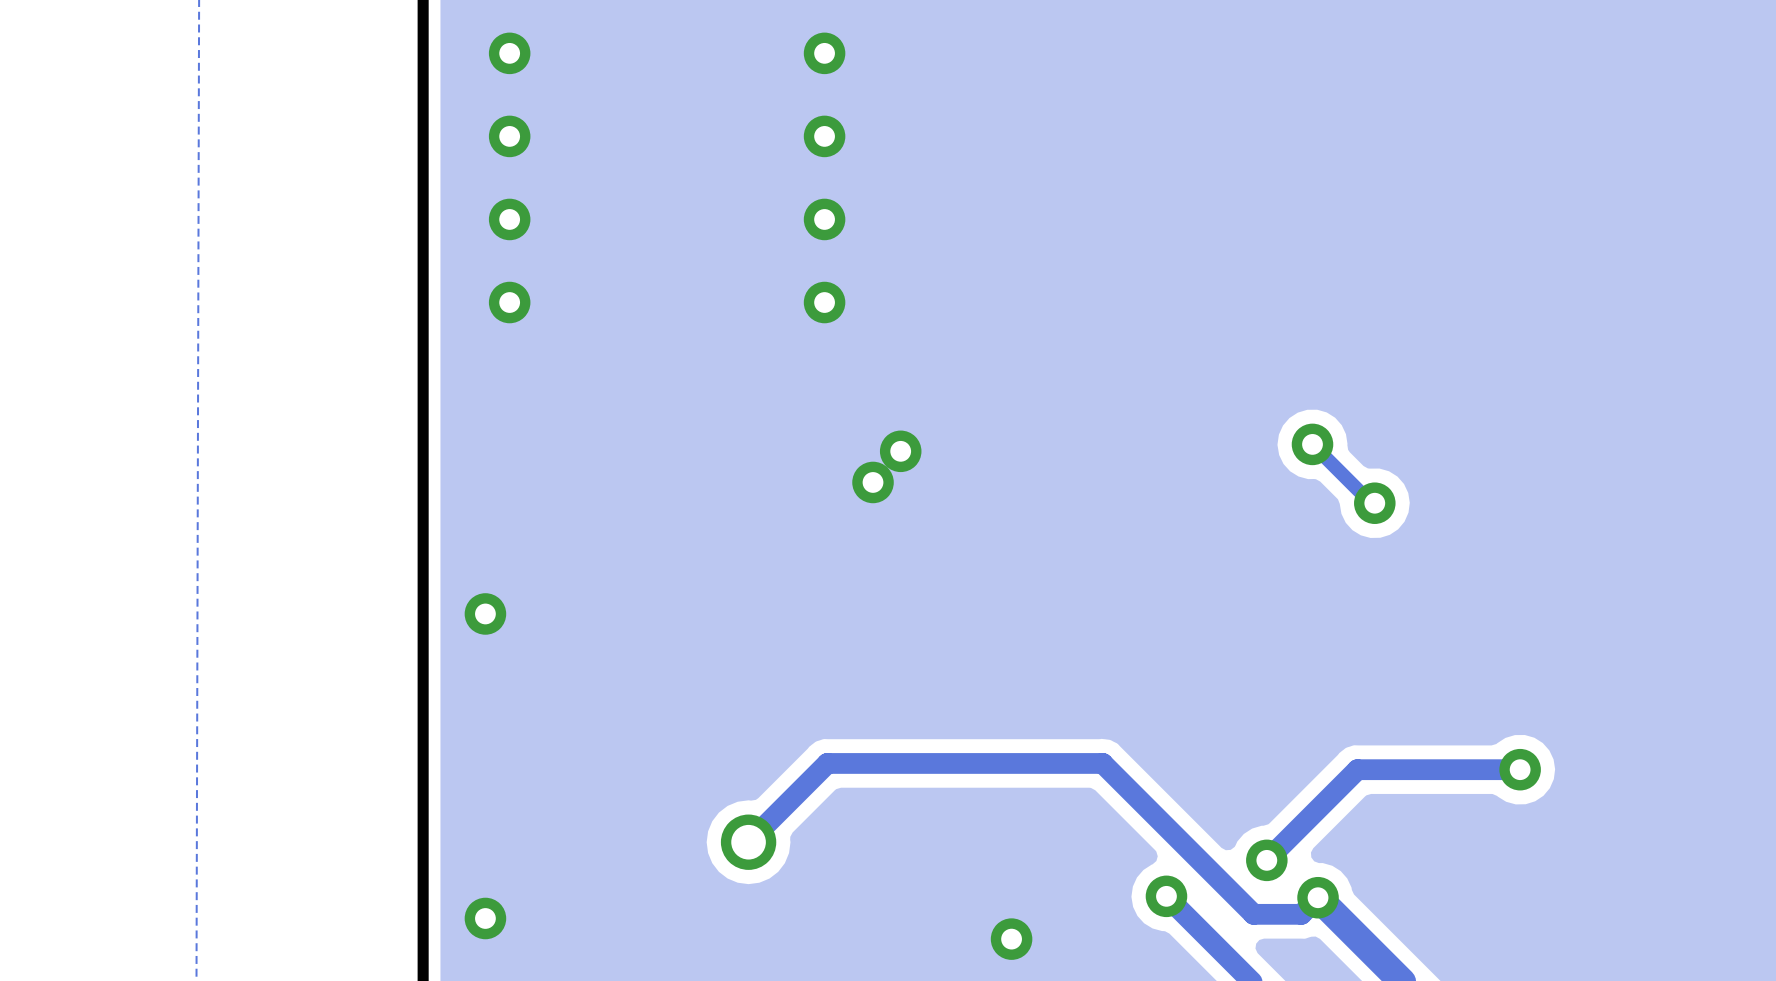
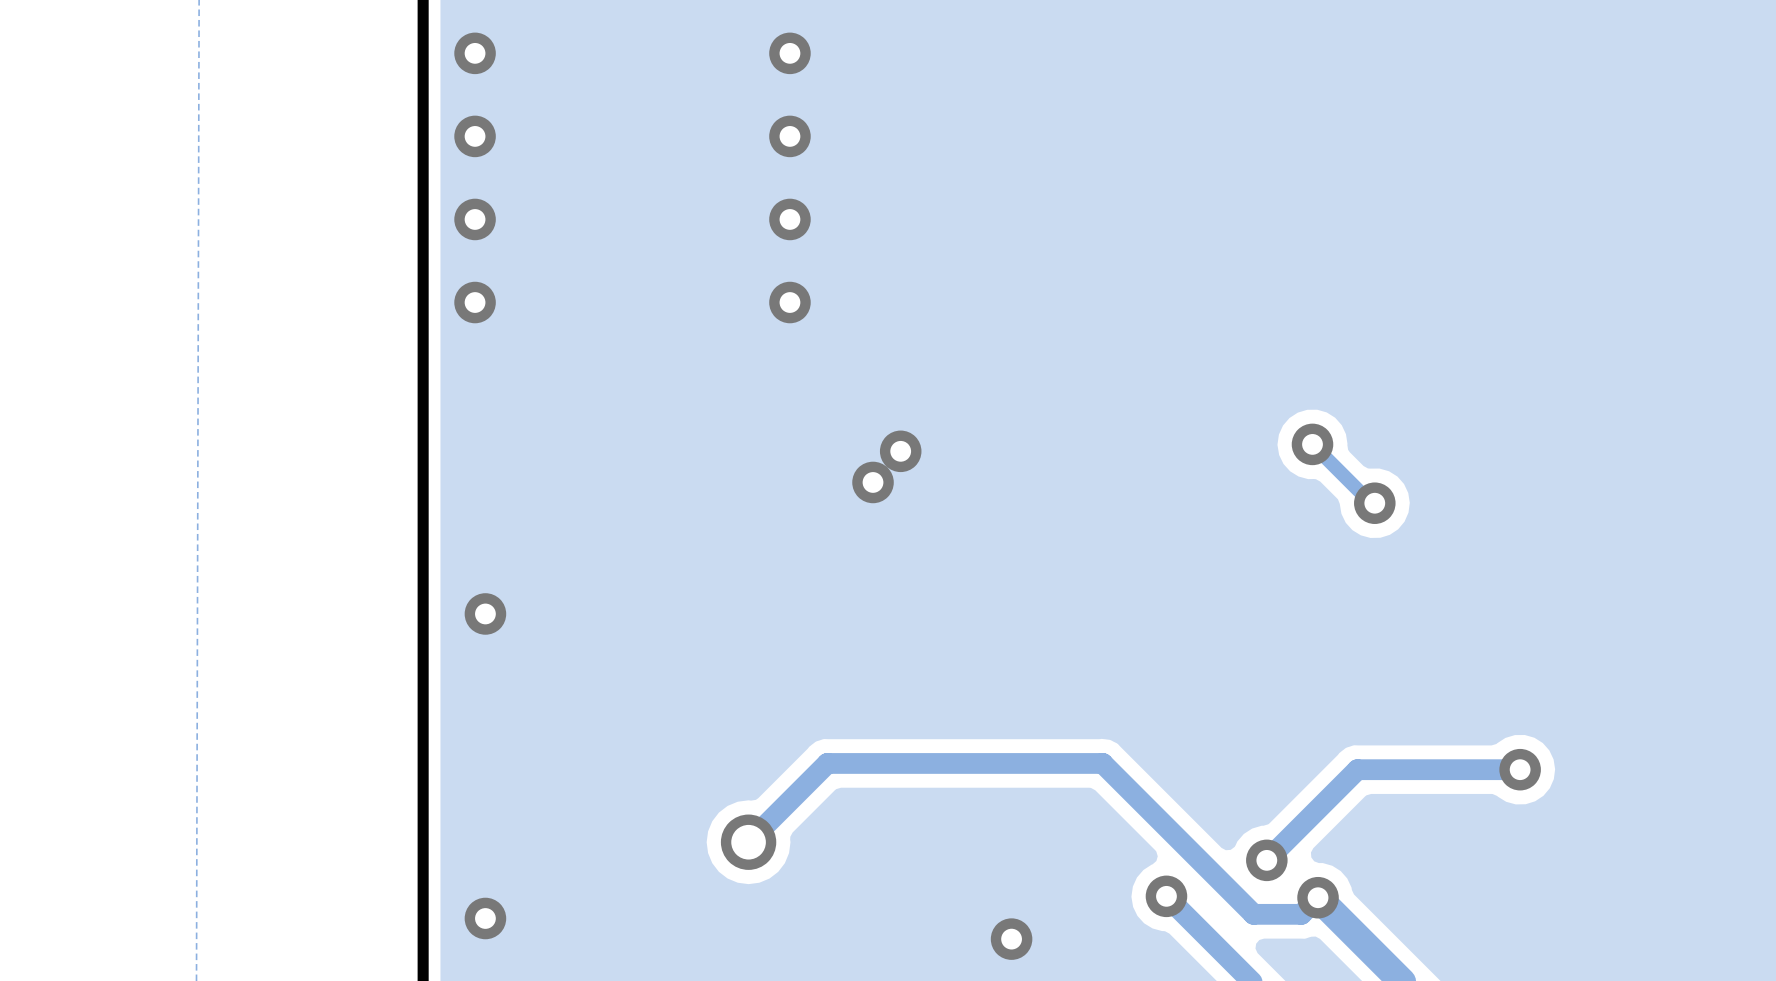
via position: (509, 53) -> (475, 53)
via position: (824, 53) -> (789, 53)
via position: (509, 136) -> (475, 136)
via position: (824, 136) -> (789, 136)
via position: (509, 219) -> (475, 219)
via position: (824, 219) -> (789, 219)
via position: (509, 302) -> (475, 302)
via position: (824, 302) -> (789, 302)

